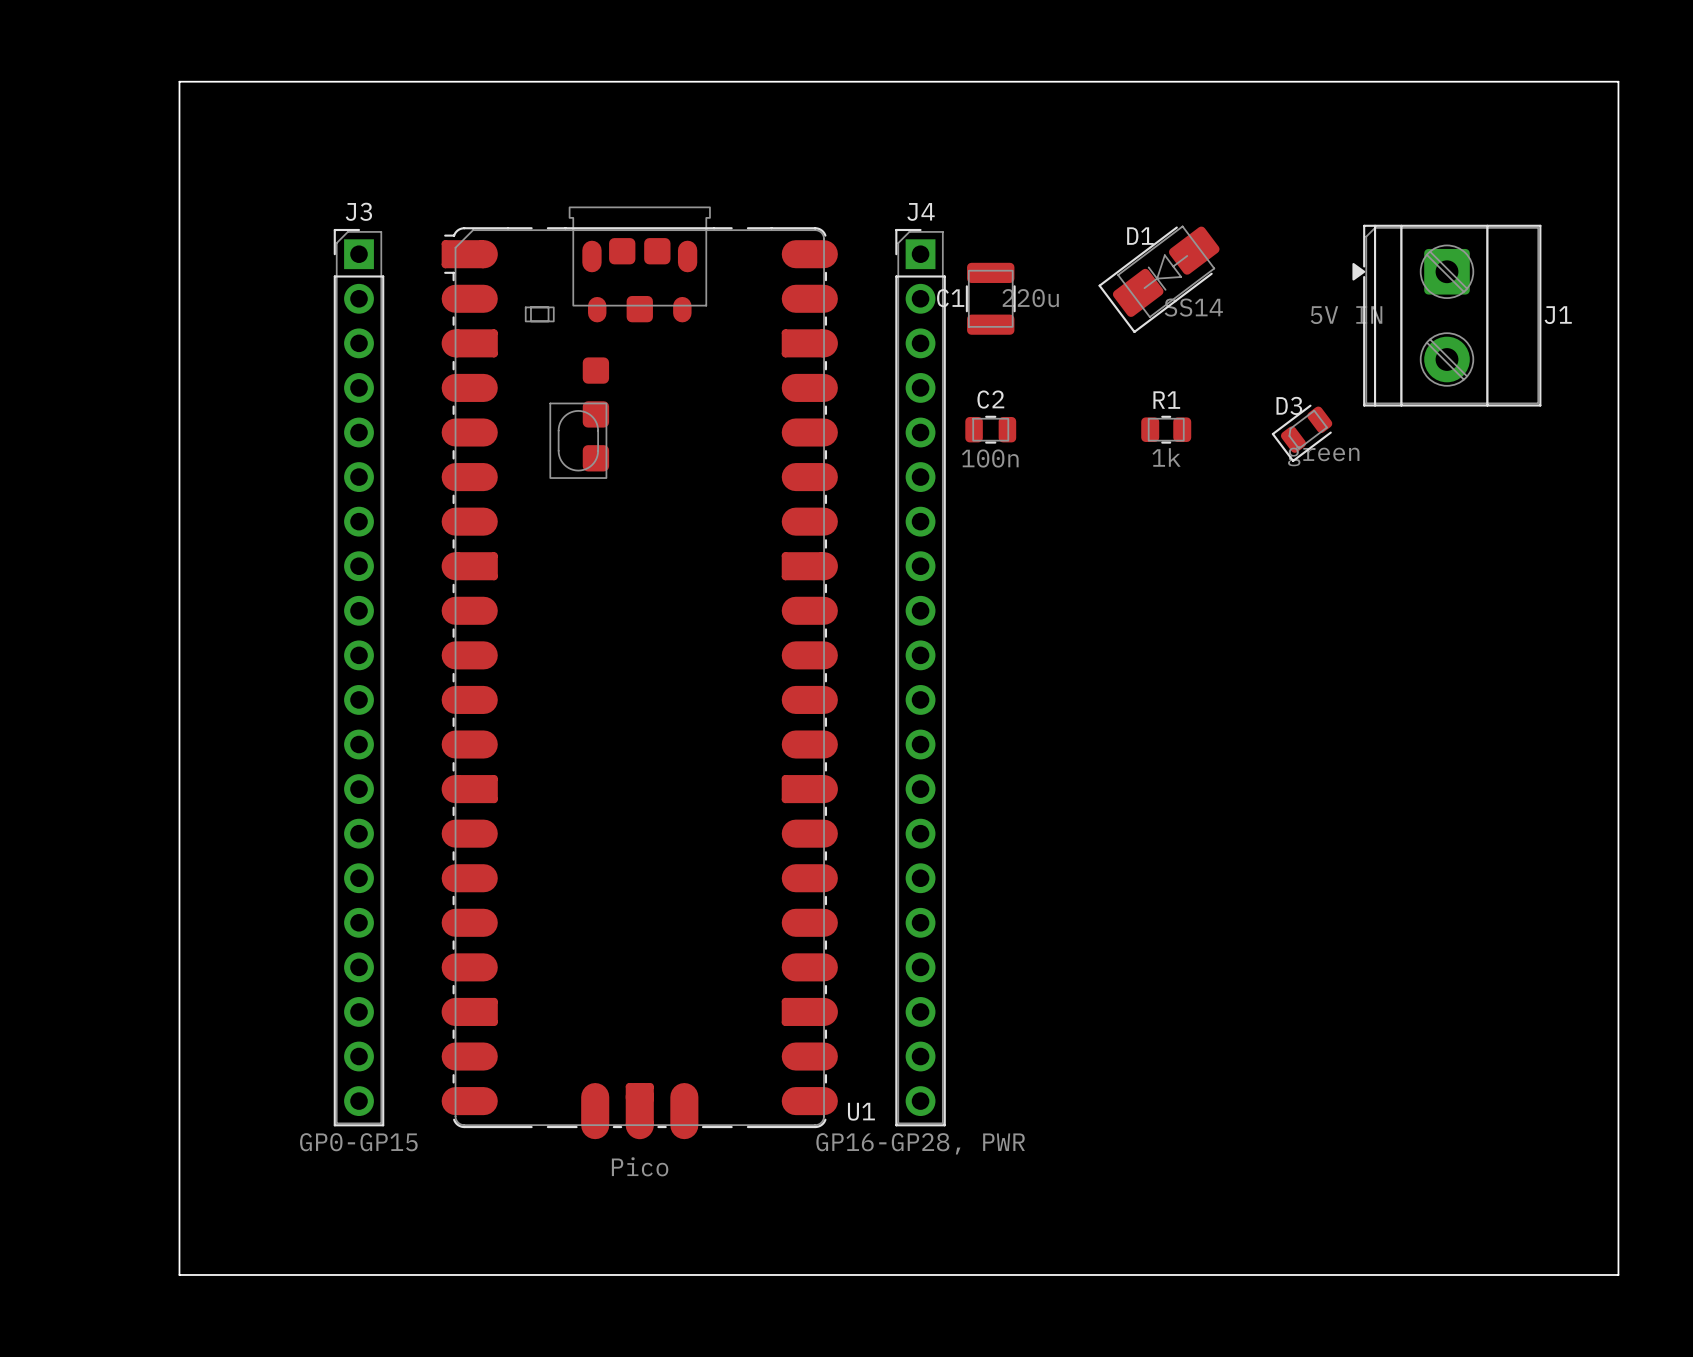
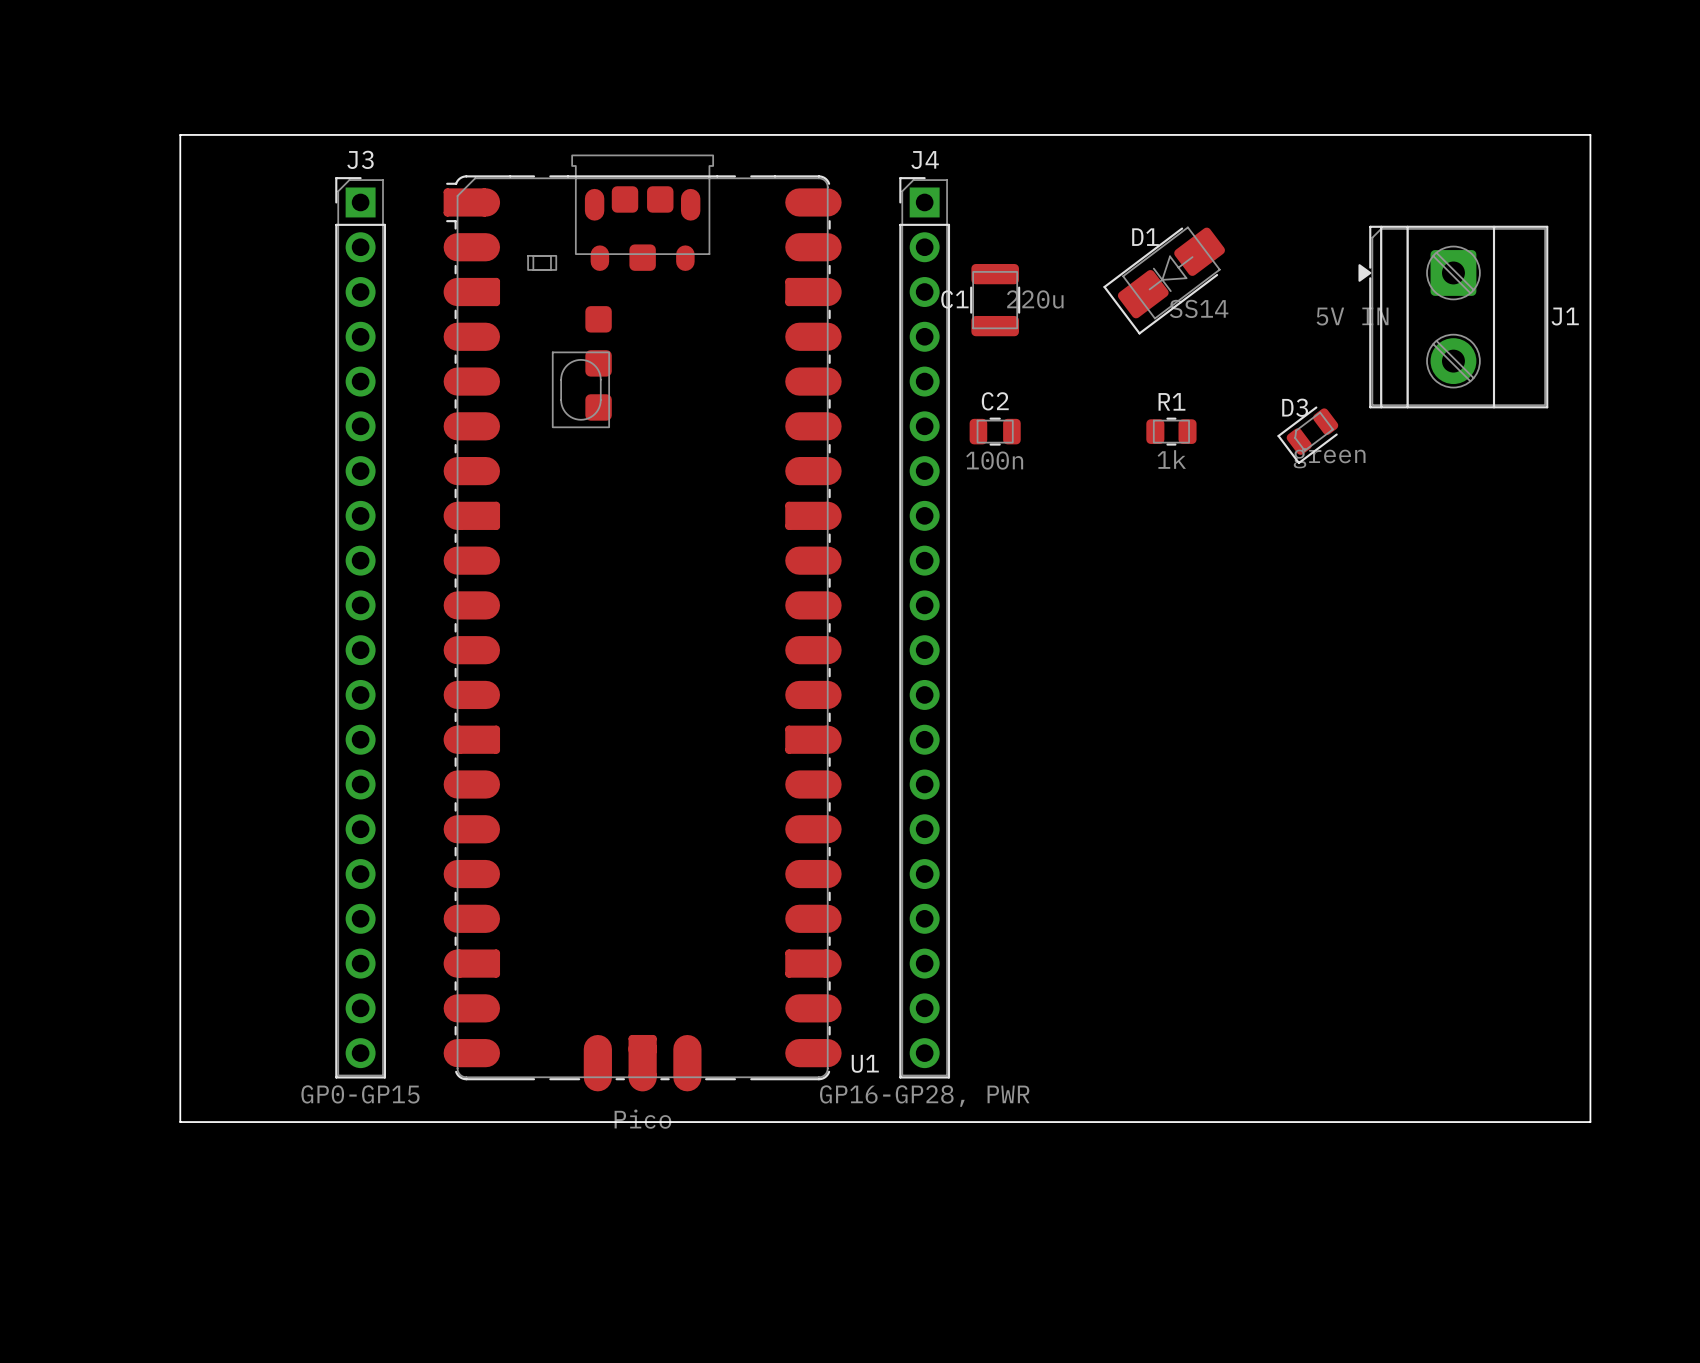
board edge: (179, 134) (179, 81) (1618, 81) (1618, 1274) (179, 1274) (179, 1117) -> (180, 134) (1590, 134) (1590, 1122) (180, 1122)
U1 position: (639, 672) -> (642, 622)
J3 position: (359, 677) -> (360, 627)
J4 position: (920, 677) -> (924, 627)

